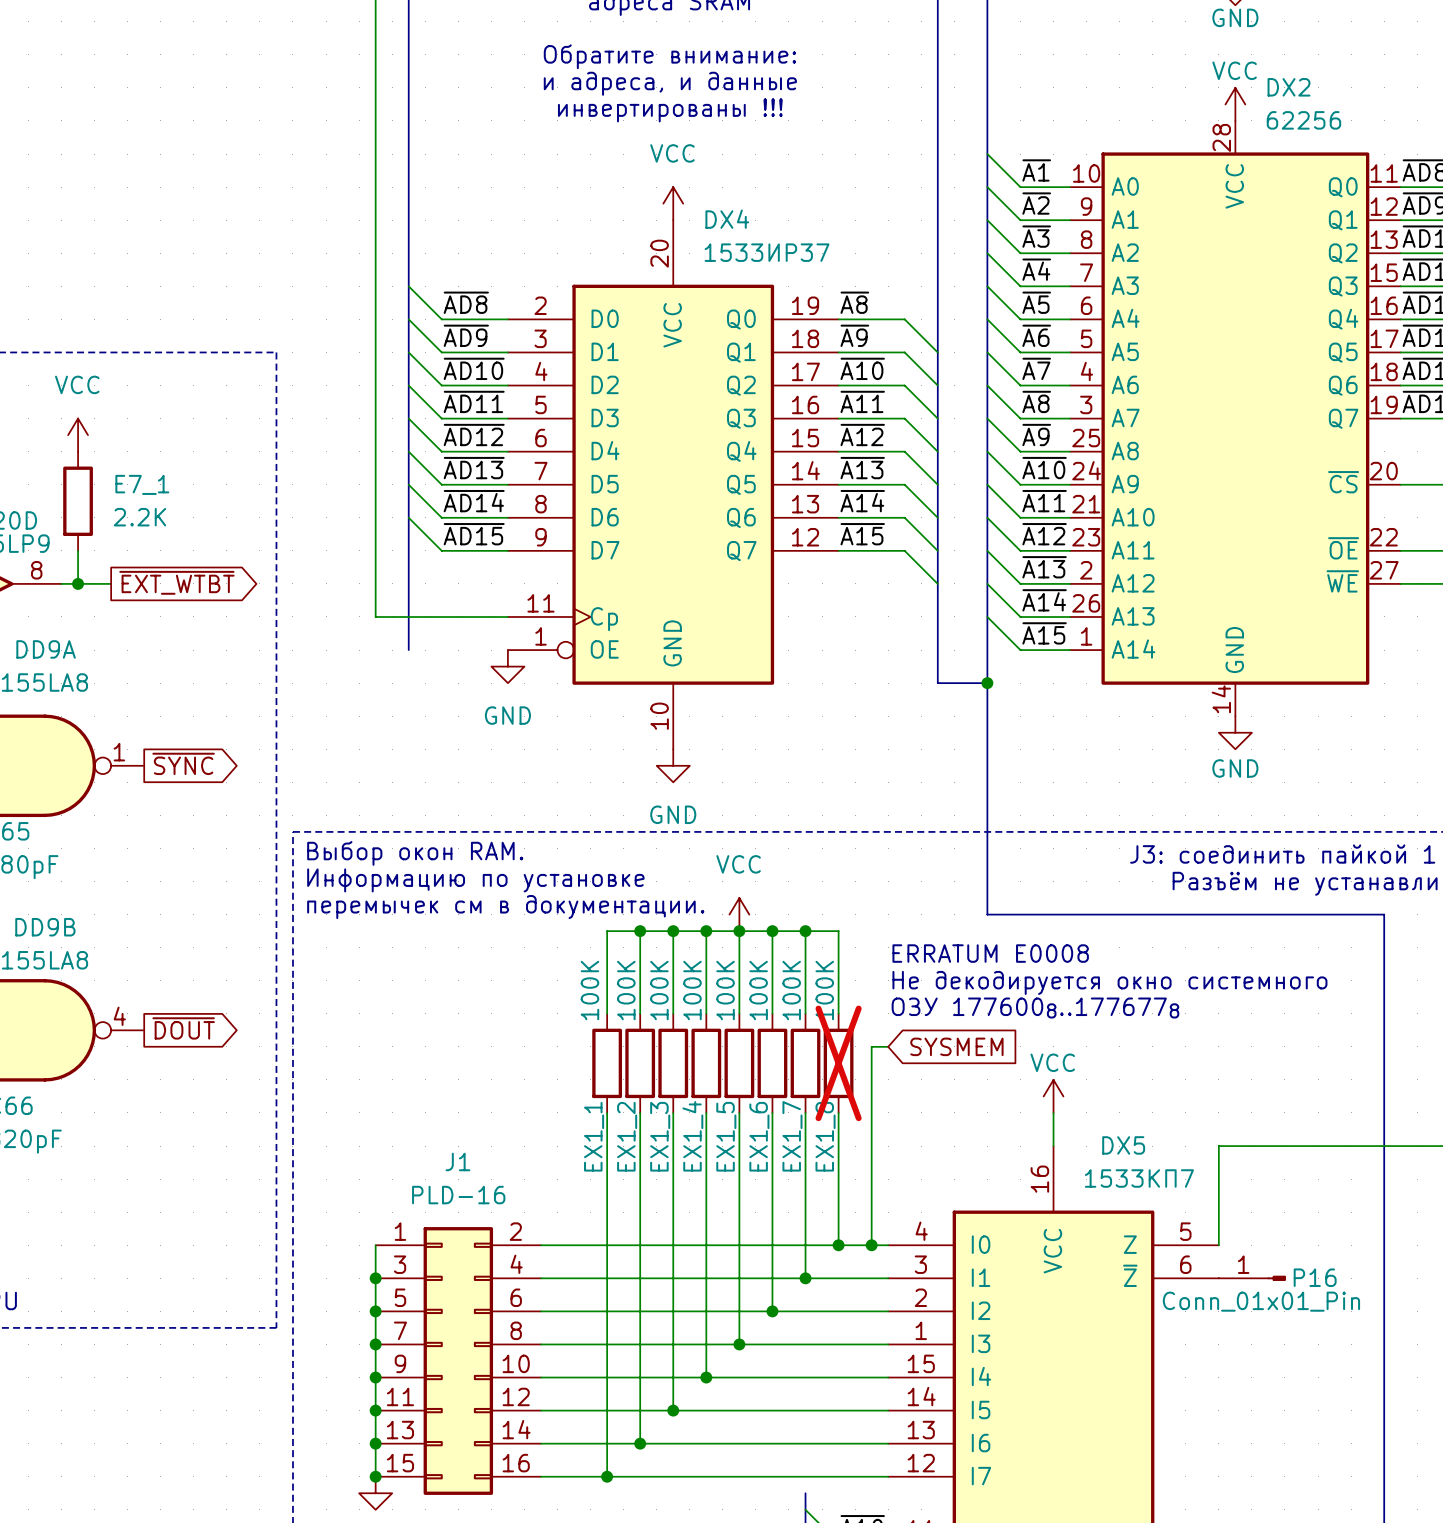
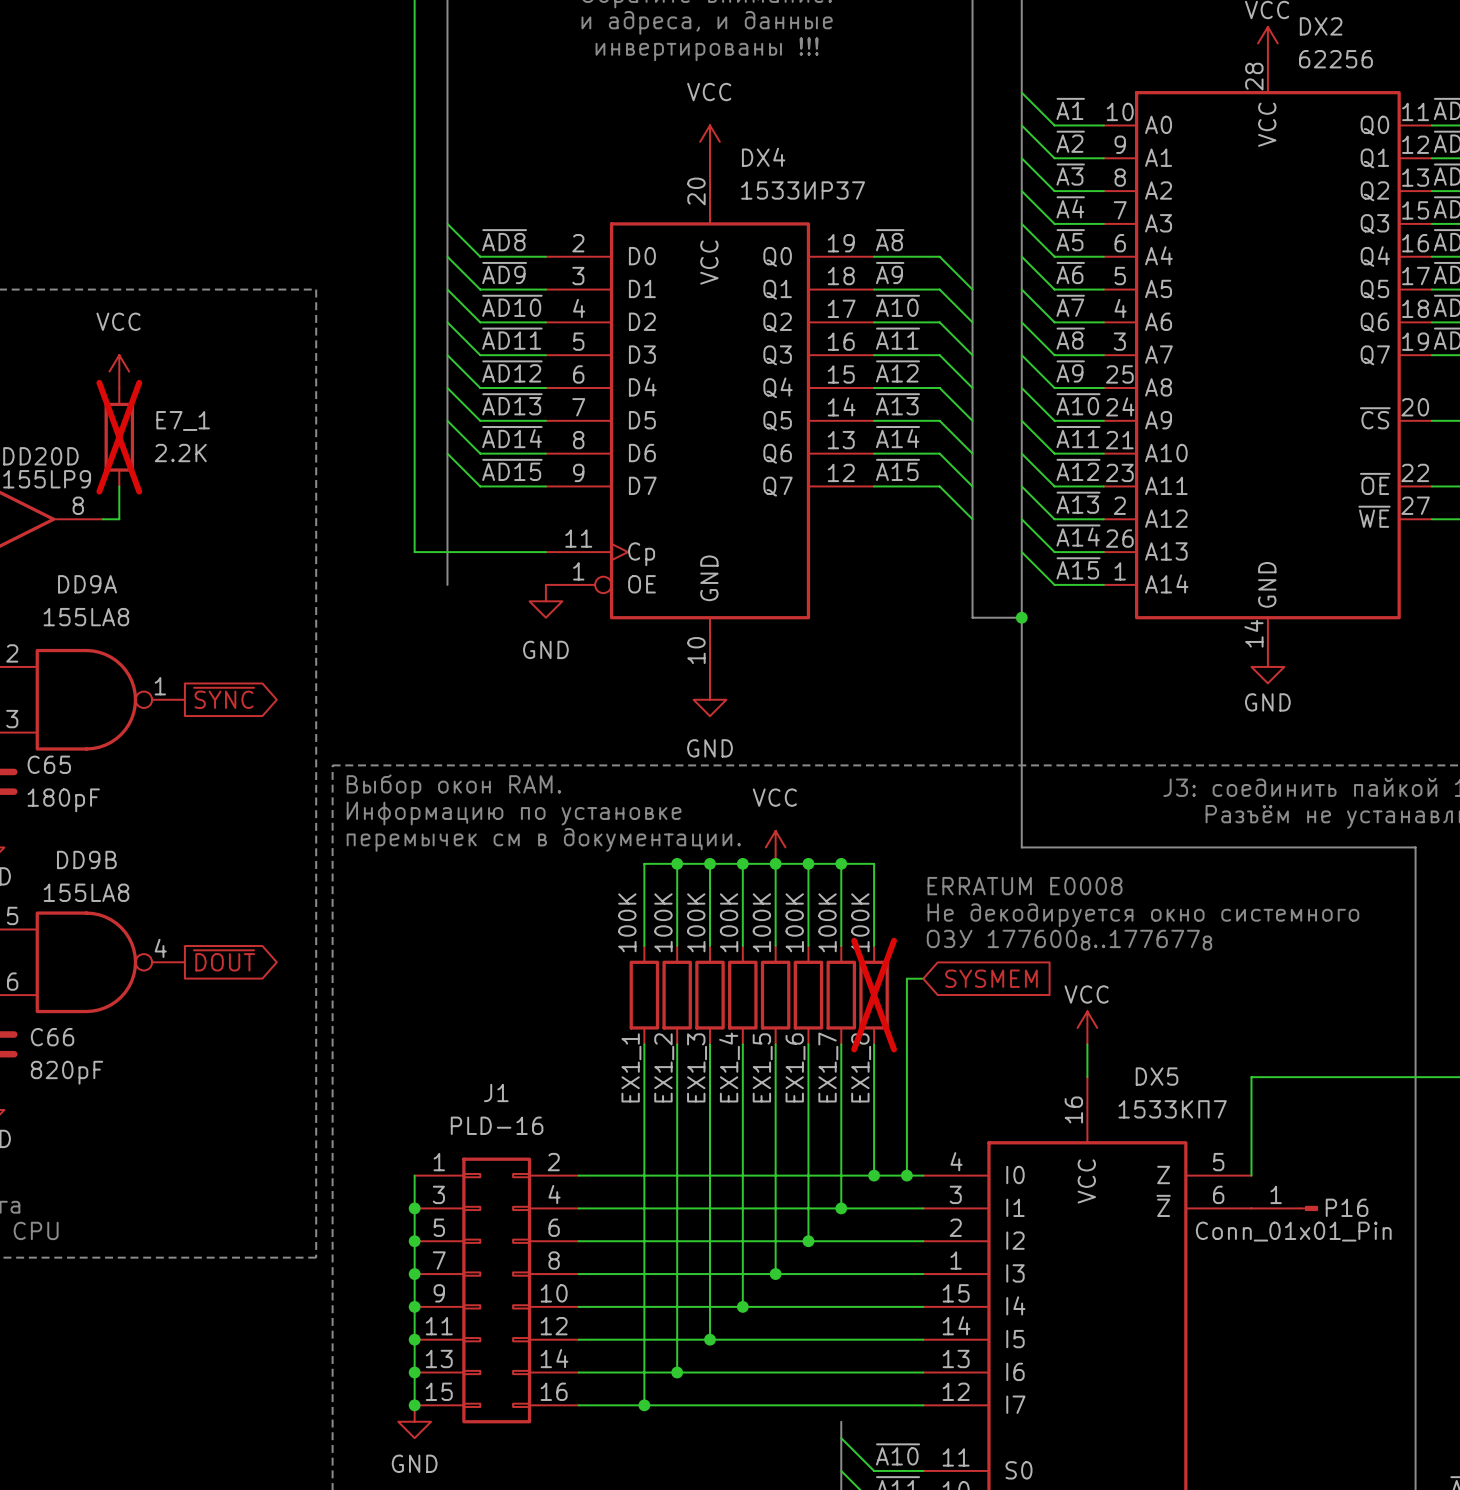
E7_1 do-not-place cross: none -> (119, 437)
global label: ~{EXT_WTBT} (176, 582) -> none
wire: (78, 583) (111, 583) -> none
junction: (78, 583) -> none

